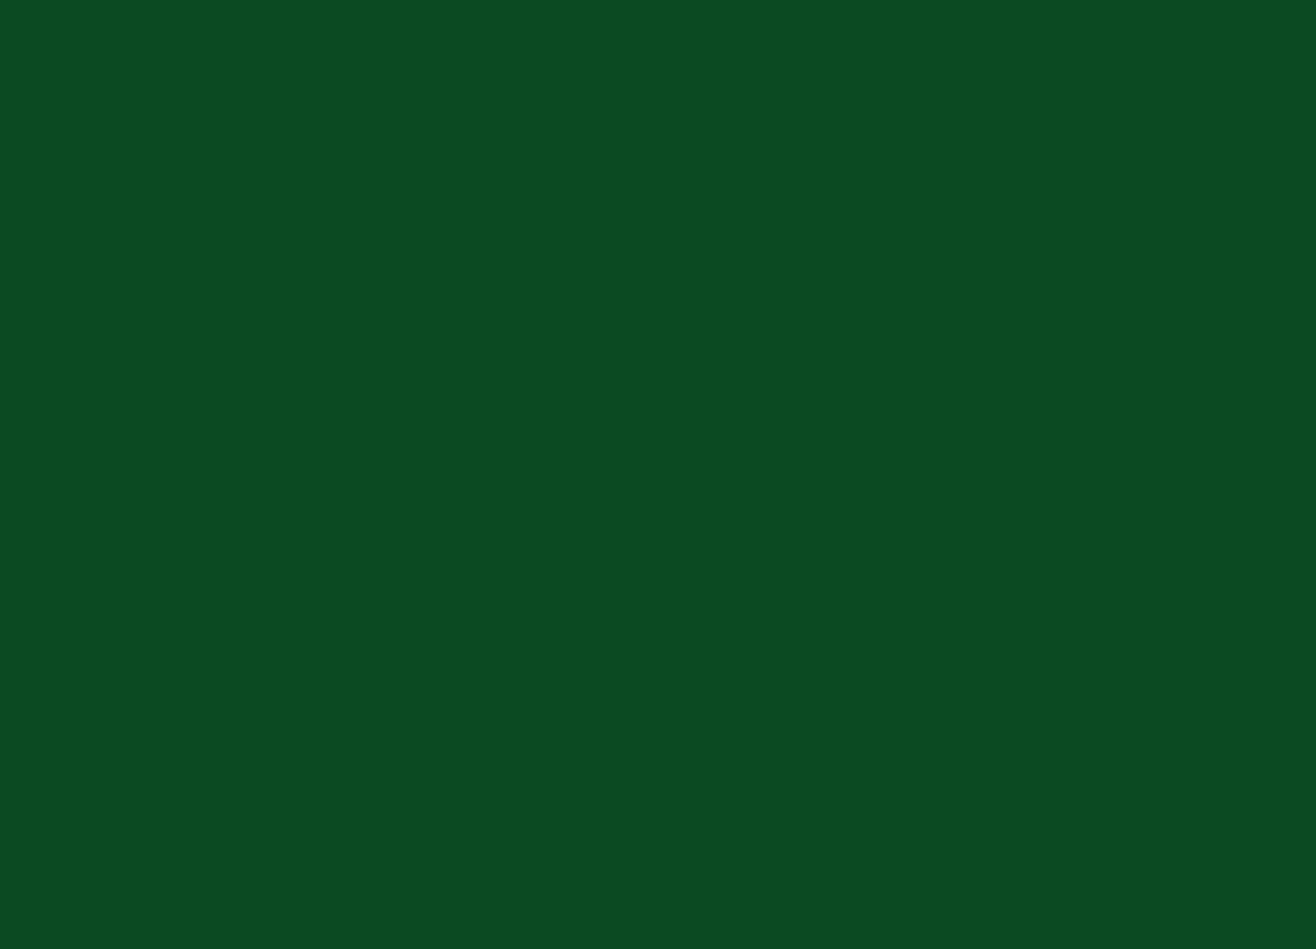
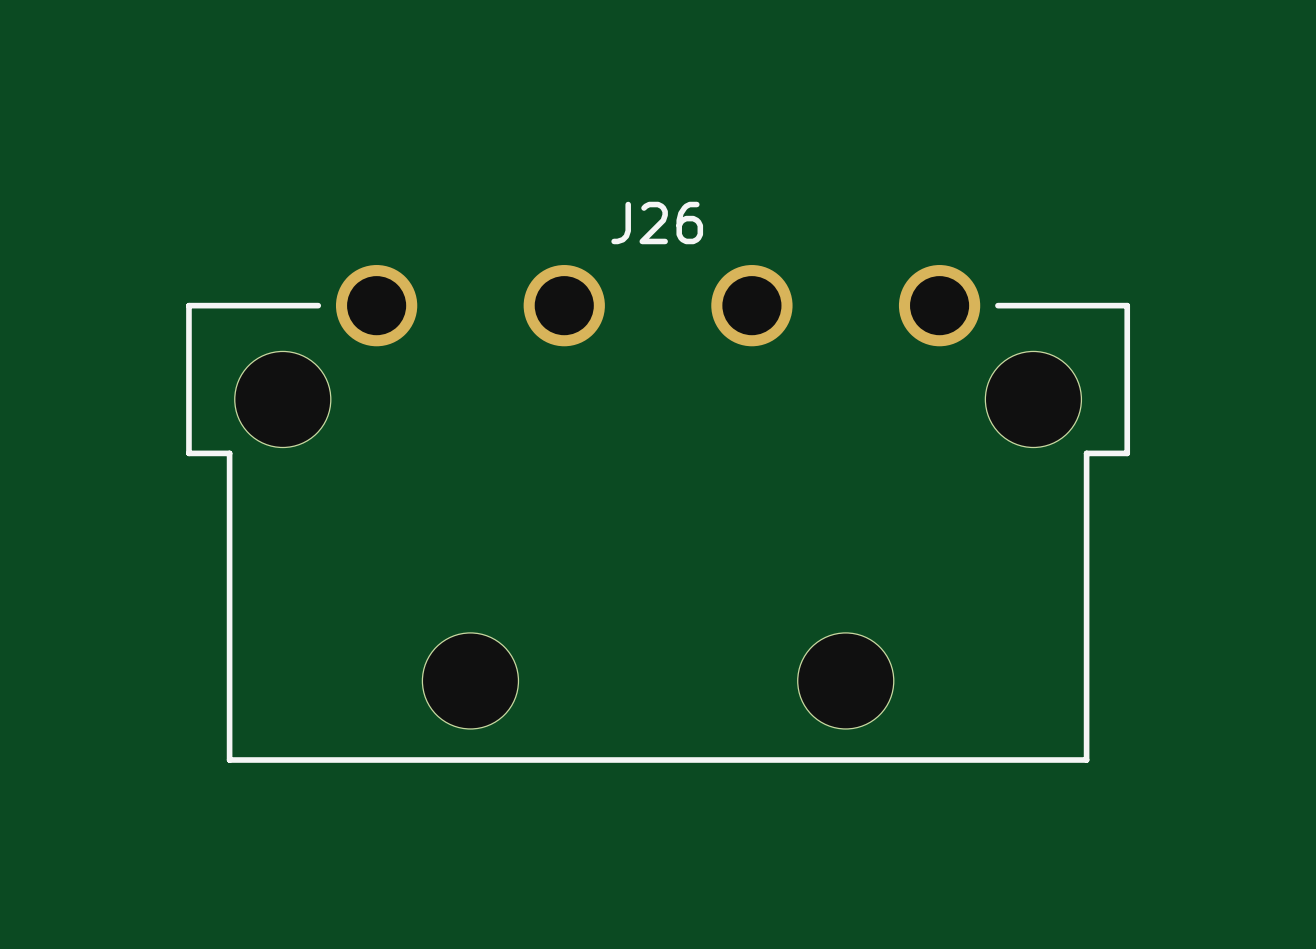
J26: none -> (658, 513)

